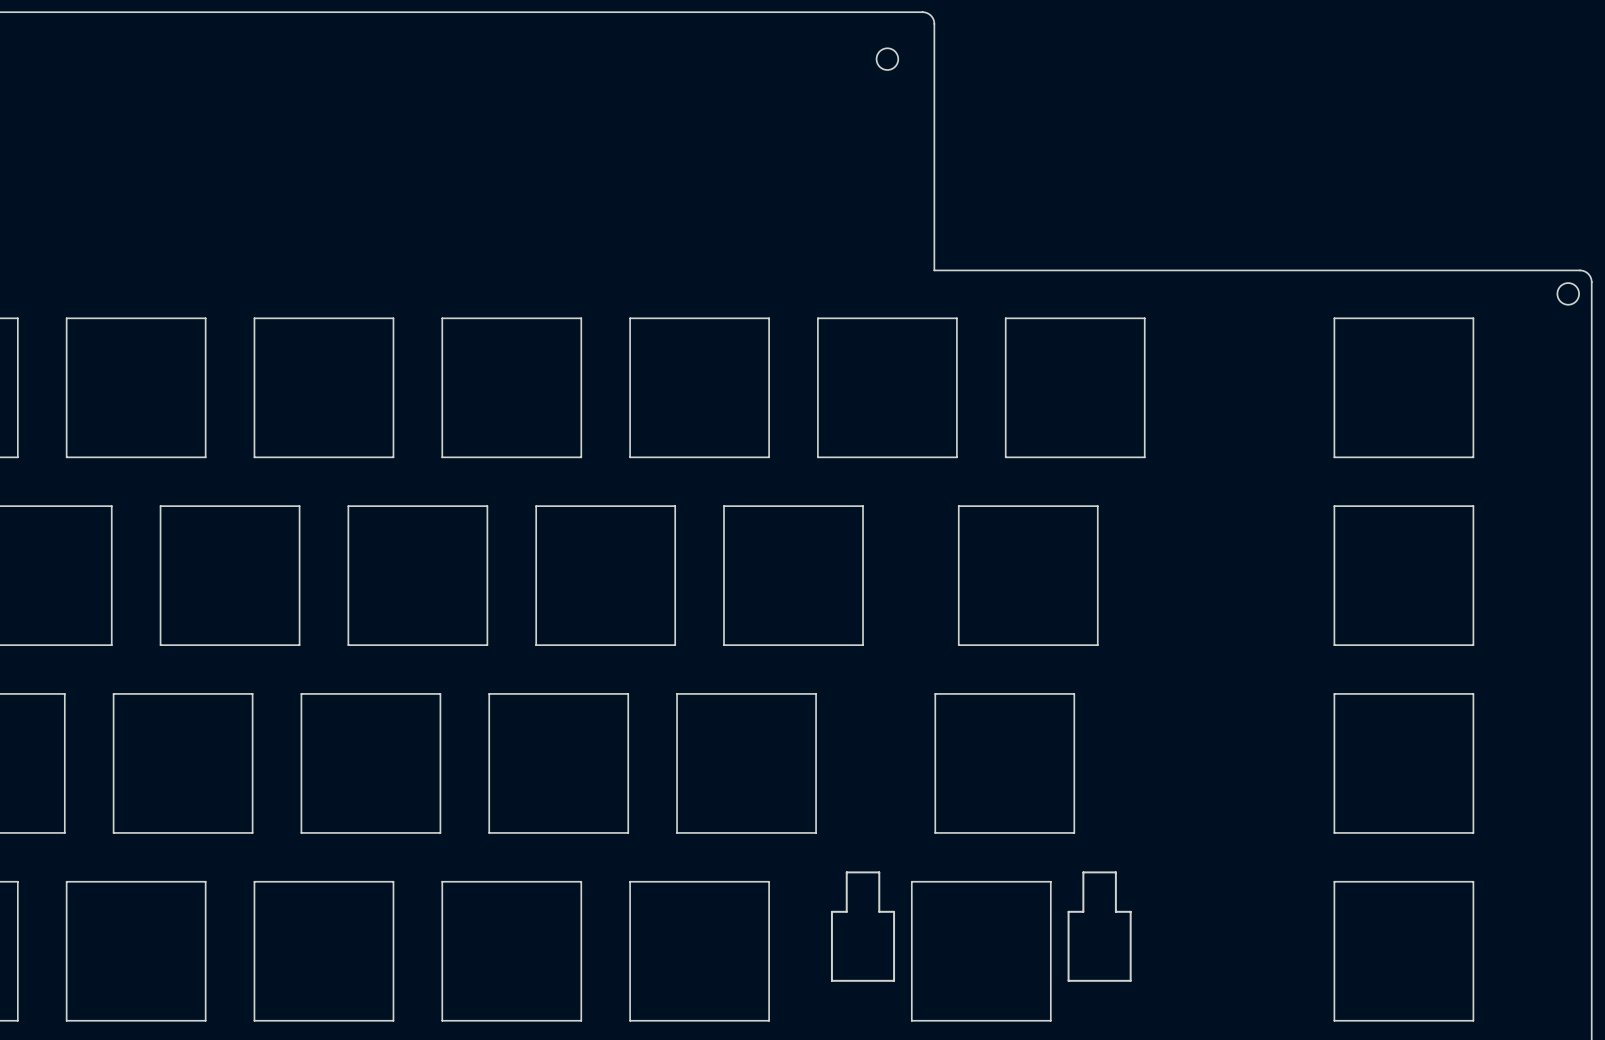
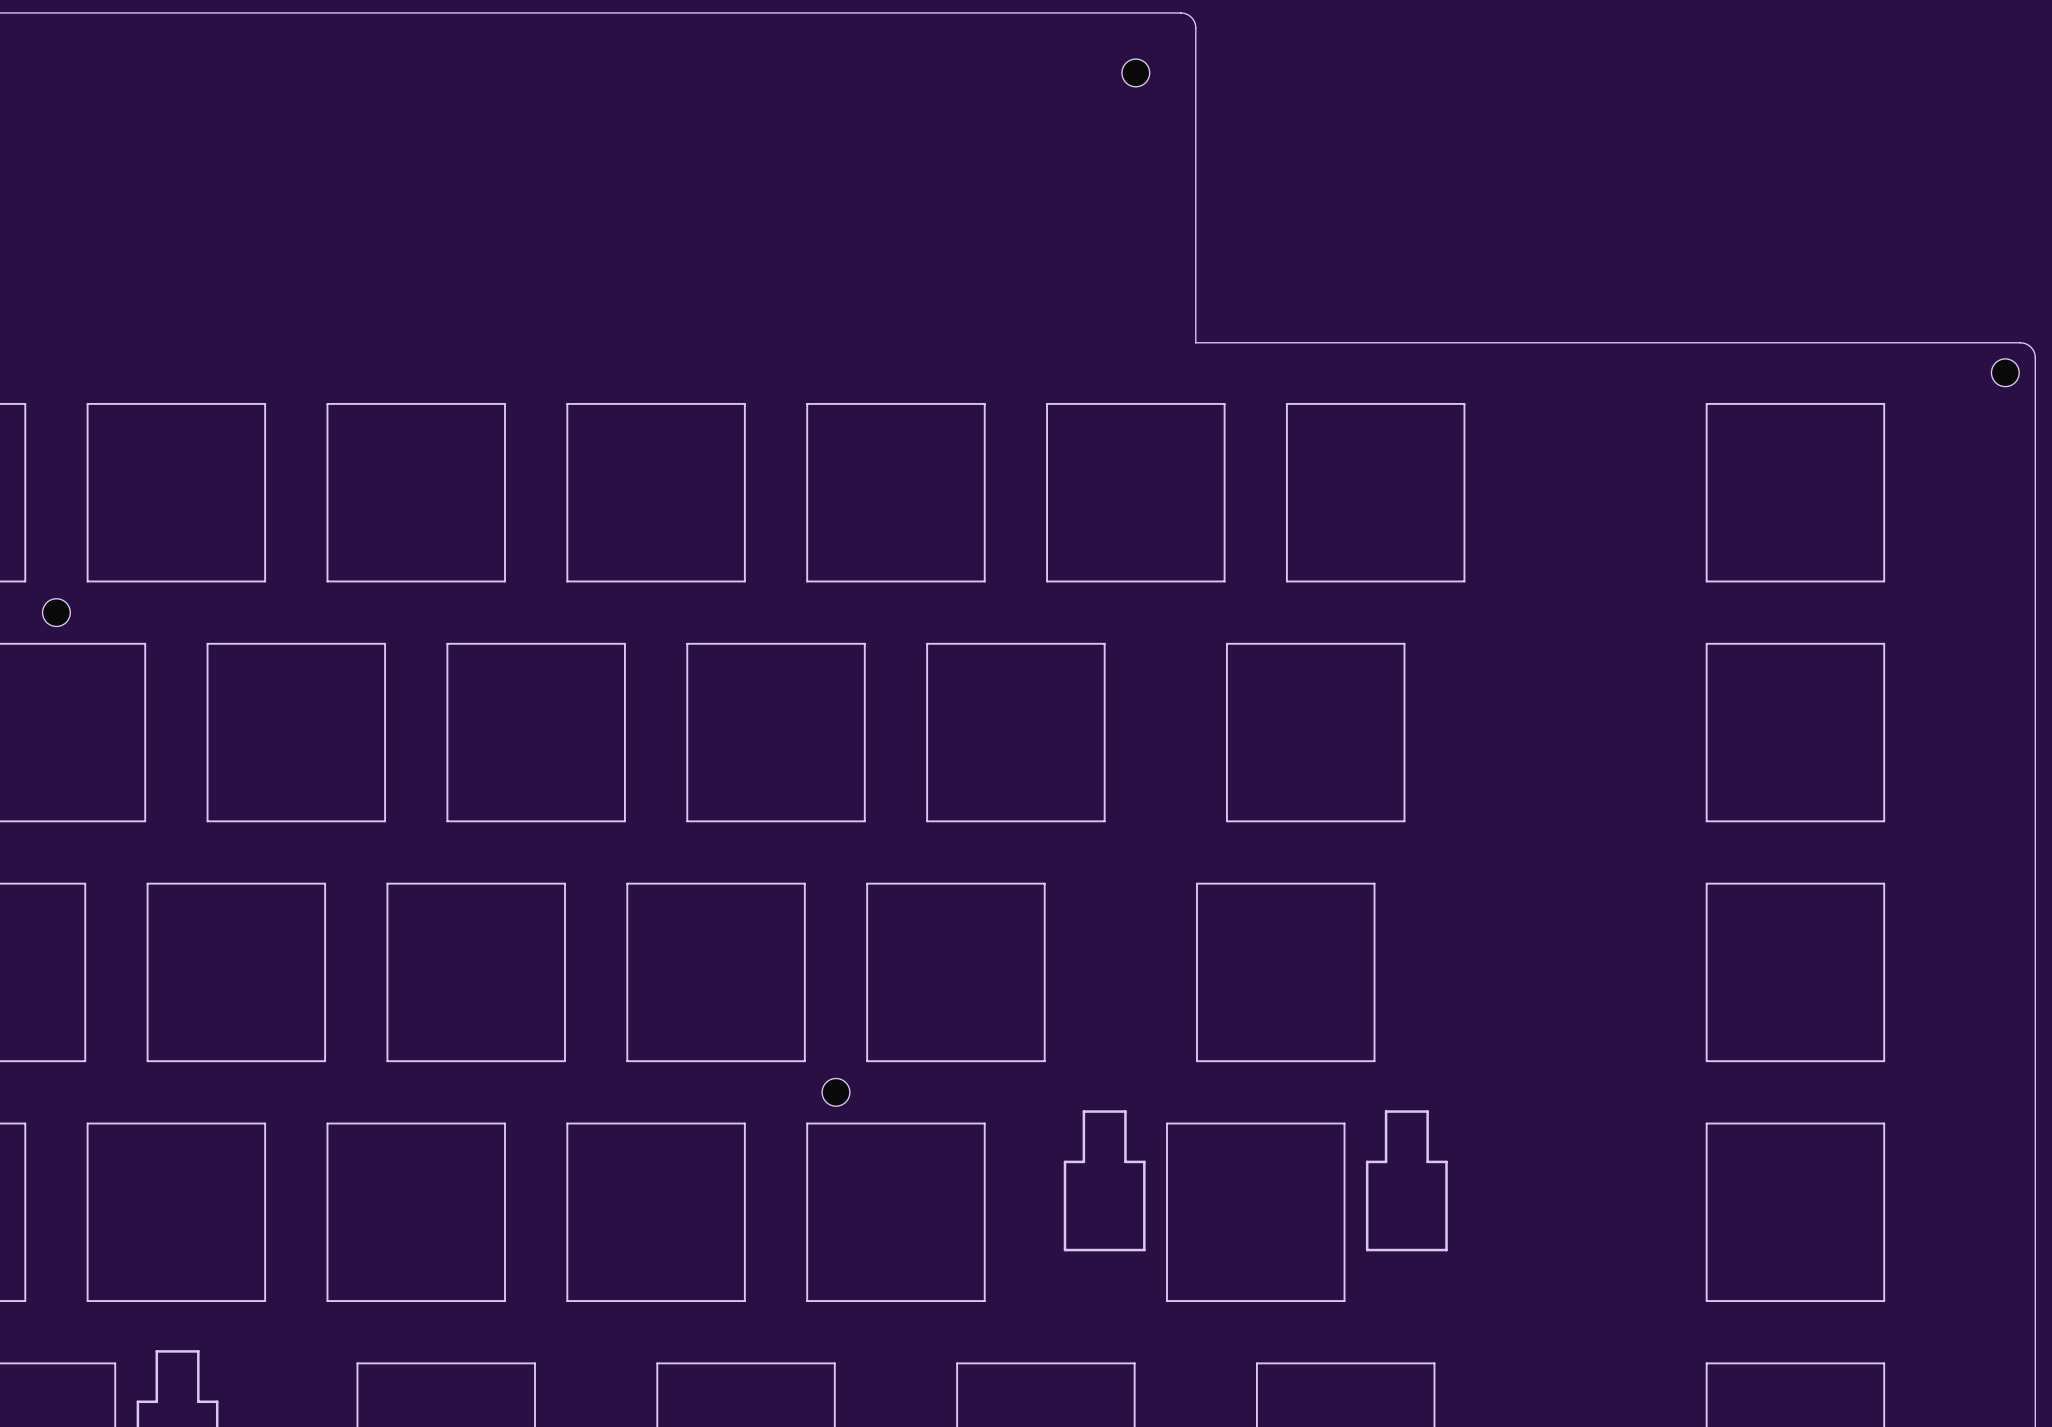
part: none -> (56, 612)
part: none -> (835, 1092)

